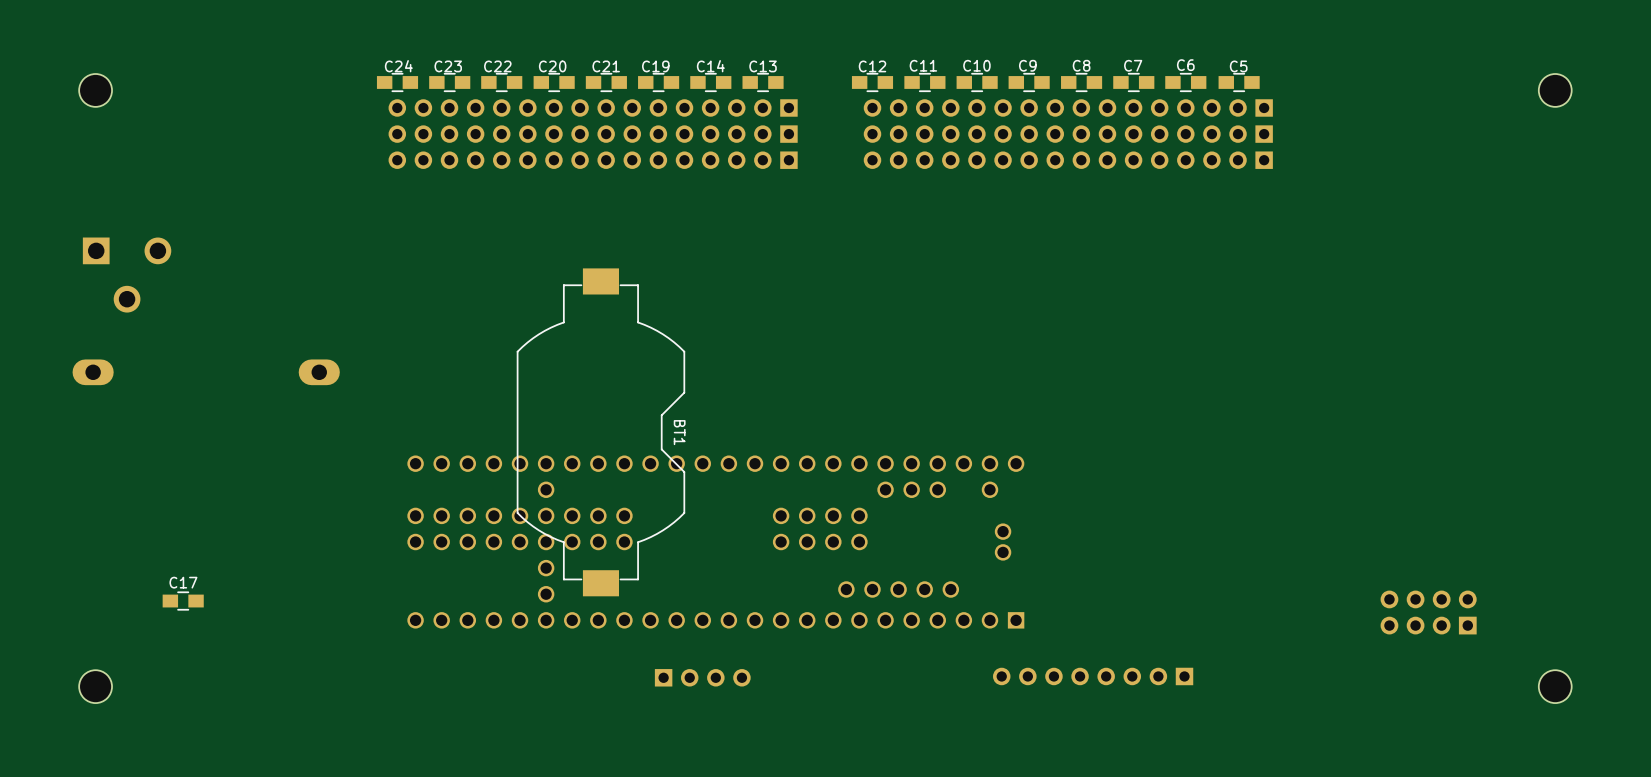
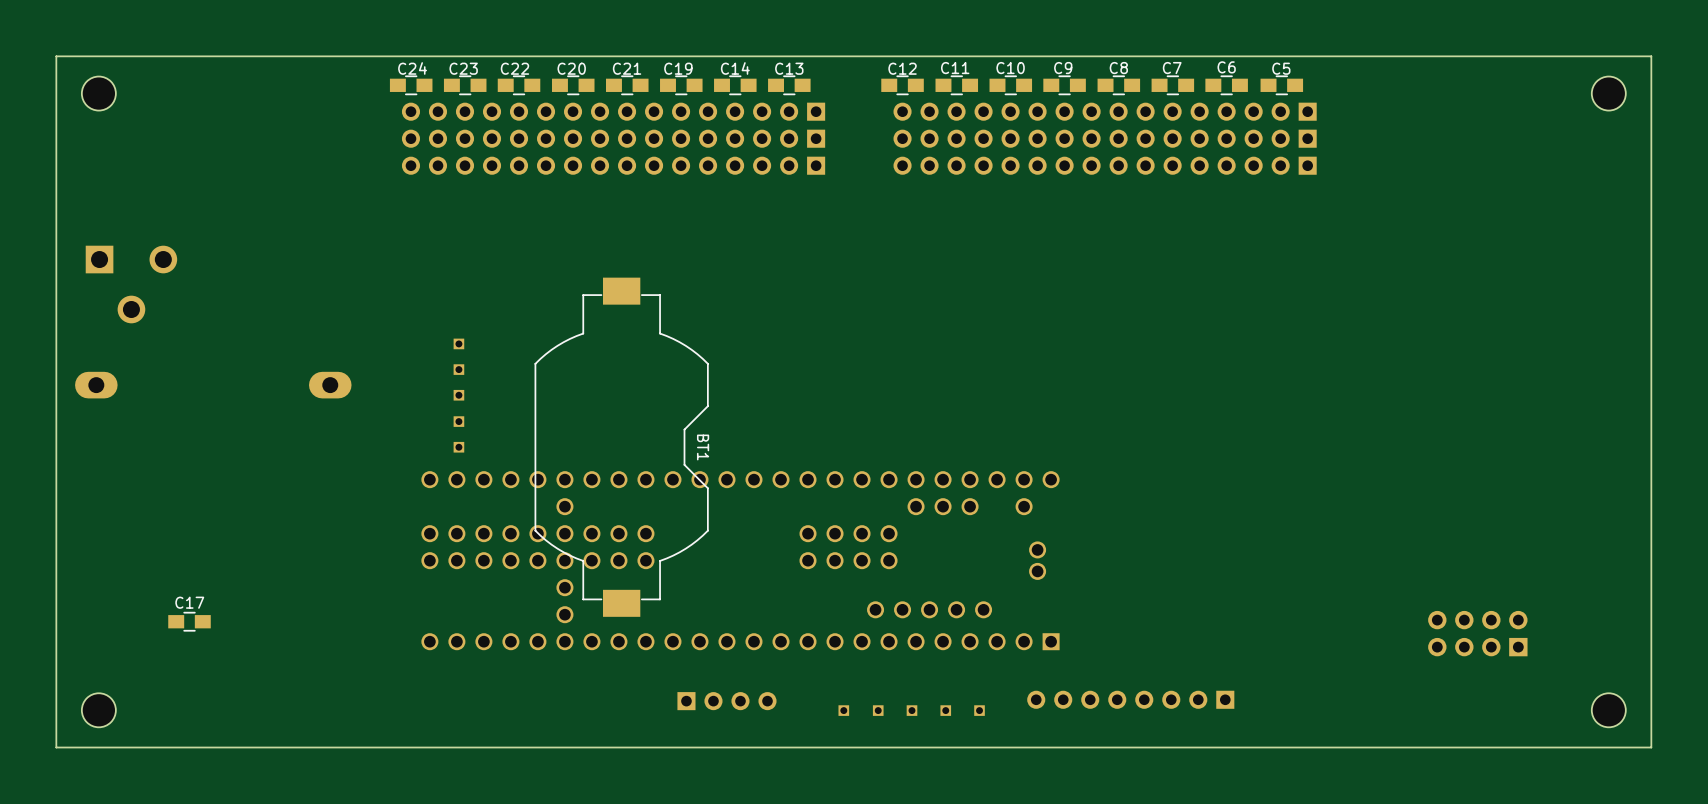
board edge: none -> (1651, 56) (1651, 747) (56, 747) (56, 56) (1651, 56)
part: none -> (458, 343)
part: none -> (458, 369)
part: none -> (458, 395)
part: none -> (458, 421)
part: none -> (458, 447)
part: none -> (843, 710)
part: none -> (878, 710)
part: none -> (911, 710)
part: none -> (945, 710)
part: none -> (979, 710)

